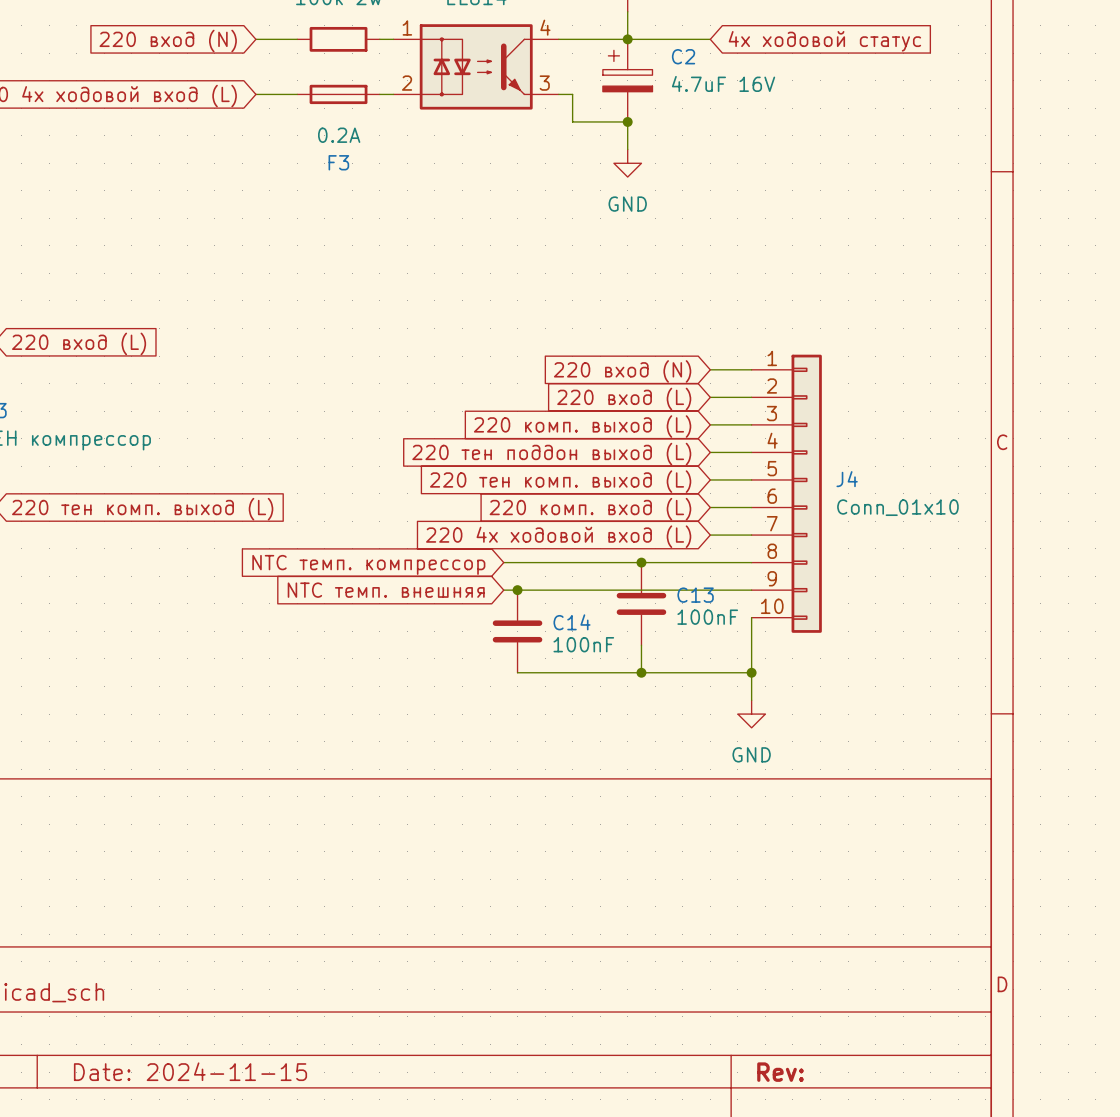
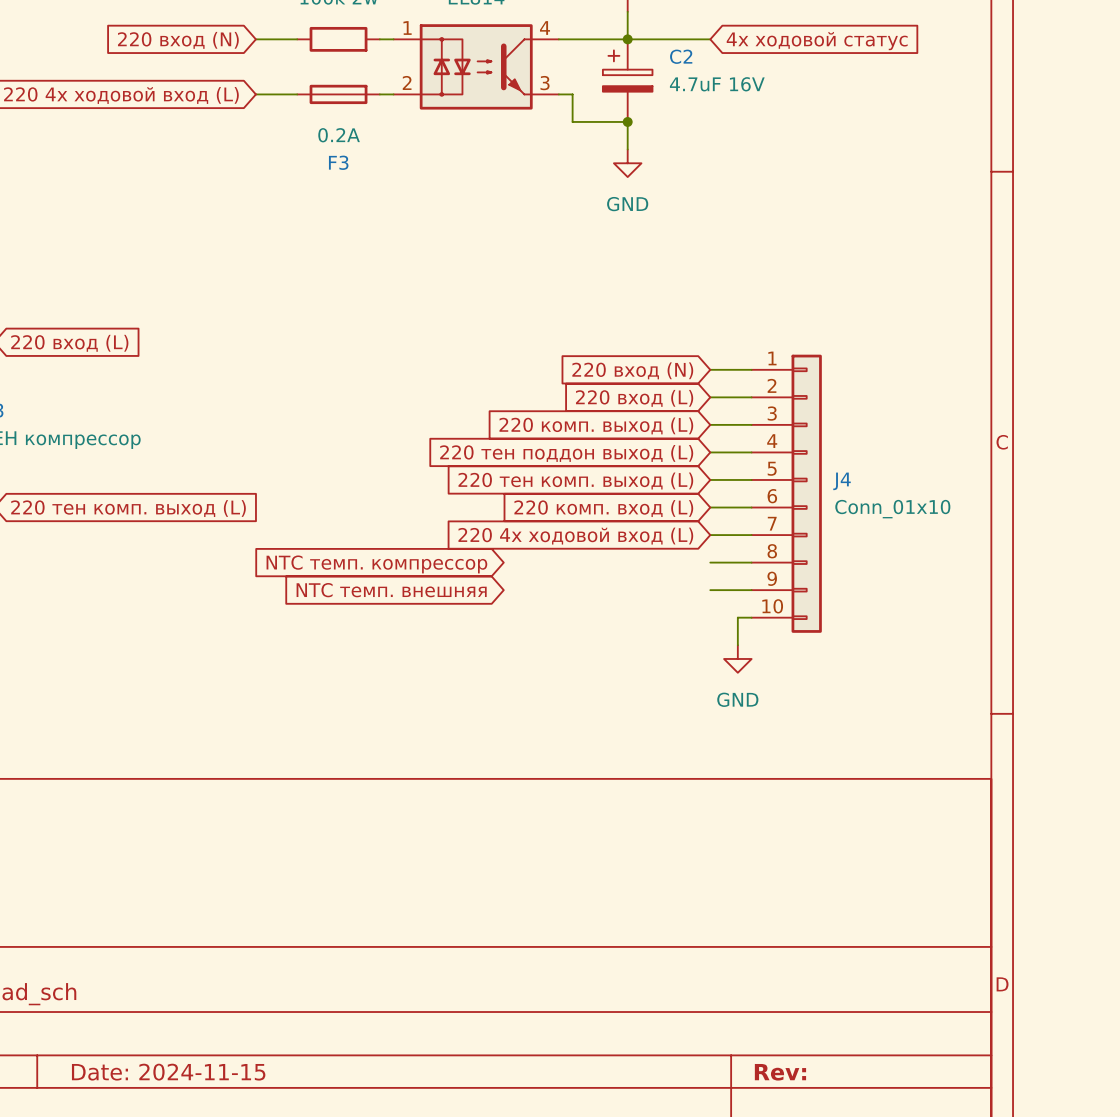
wire: (503, 562) (710, 562) -> none
junction: (641, 562) -> none
wire: (503, 590) (710, 590) -> none
junction: (517, 590) -> none
C13: 100nF (641, 603) -> none
wire: (751, 617) (751, 700) -> (751, 617) (737, 617) (737, 645)
C14: 100nF (517, 631) -> none
wire: (641, 645) (641, 672) -> none
wire: (517, 672) (751, 672) -> none
junction: (641, 672) -> none
junction: (751, 672) -> none
power symbol position: GND (751, 714) -> GND (737, 658)

